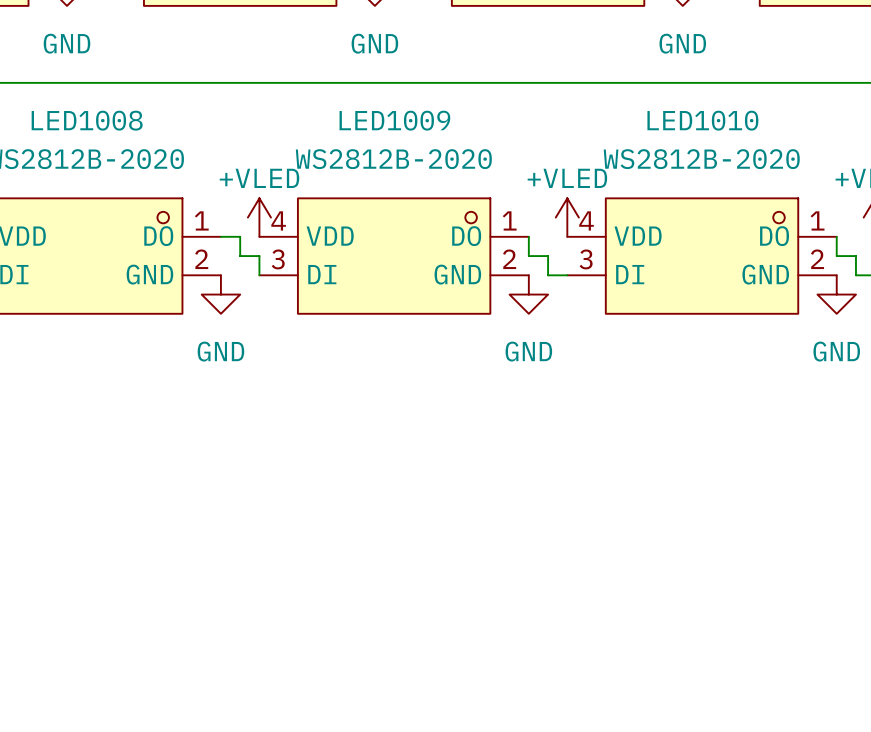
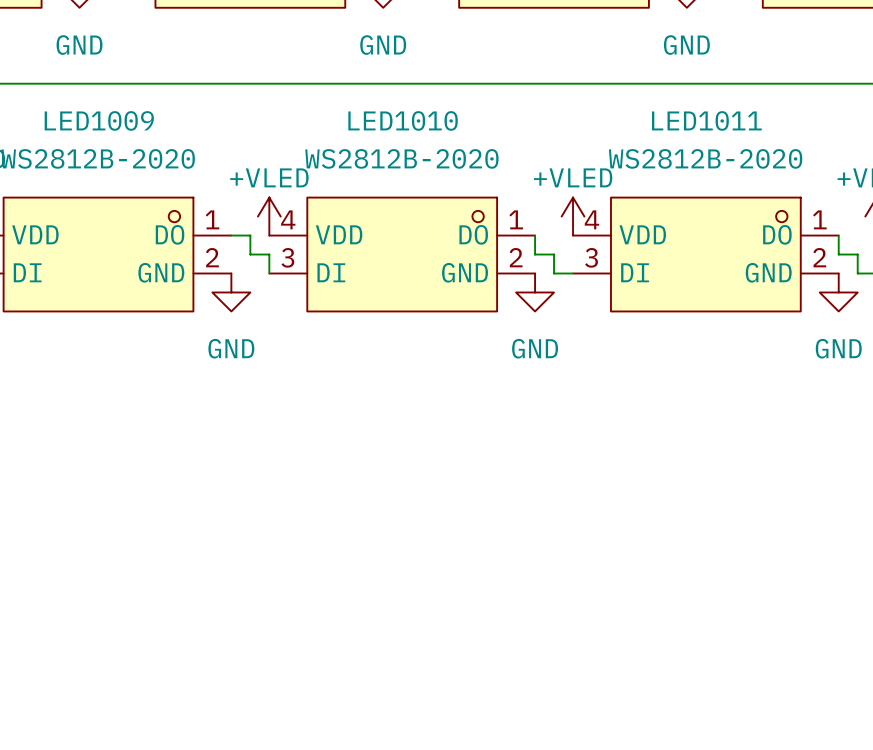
LED1008 name: LED1008 (87, 120) -> LED1009 (99, 120)
LED1009 name: LED1009 (394, 120) -> LED1010 (403, 120)
LED1010 name: LED1010 (702, 120) -> LED1011 (706, 120)

